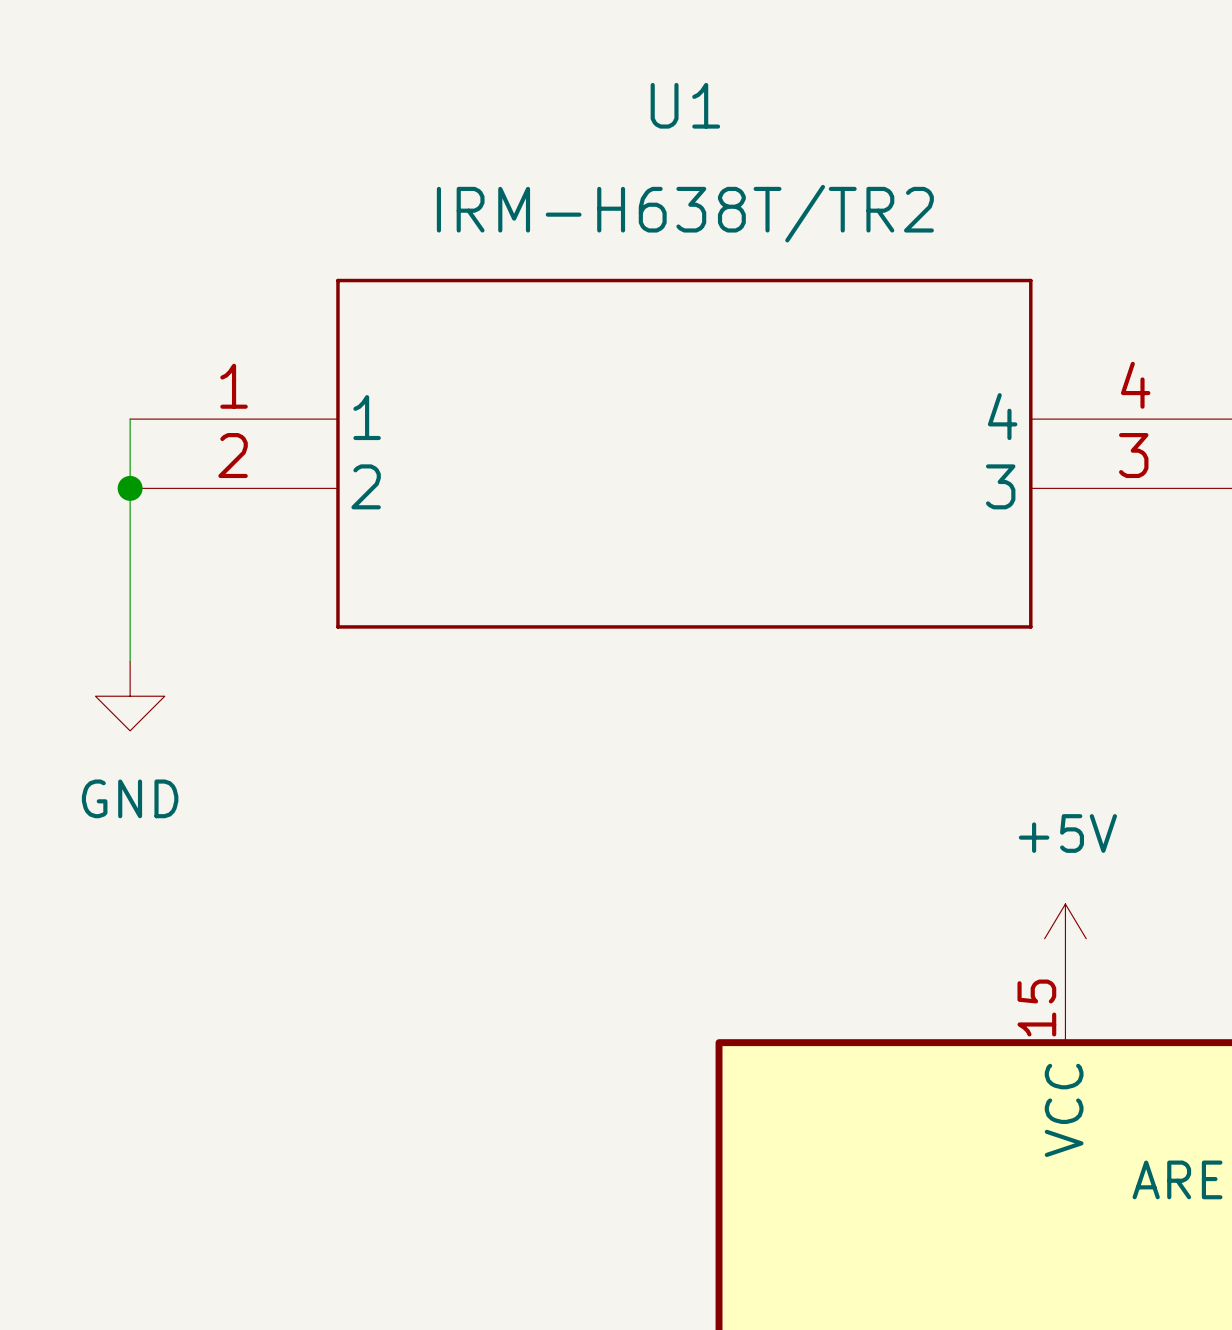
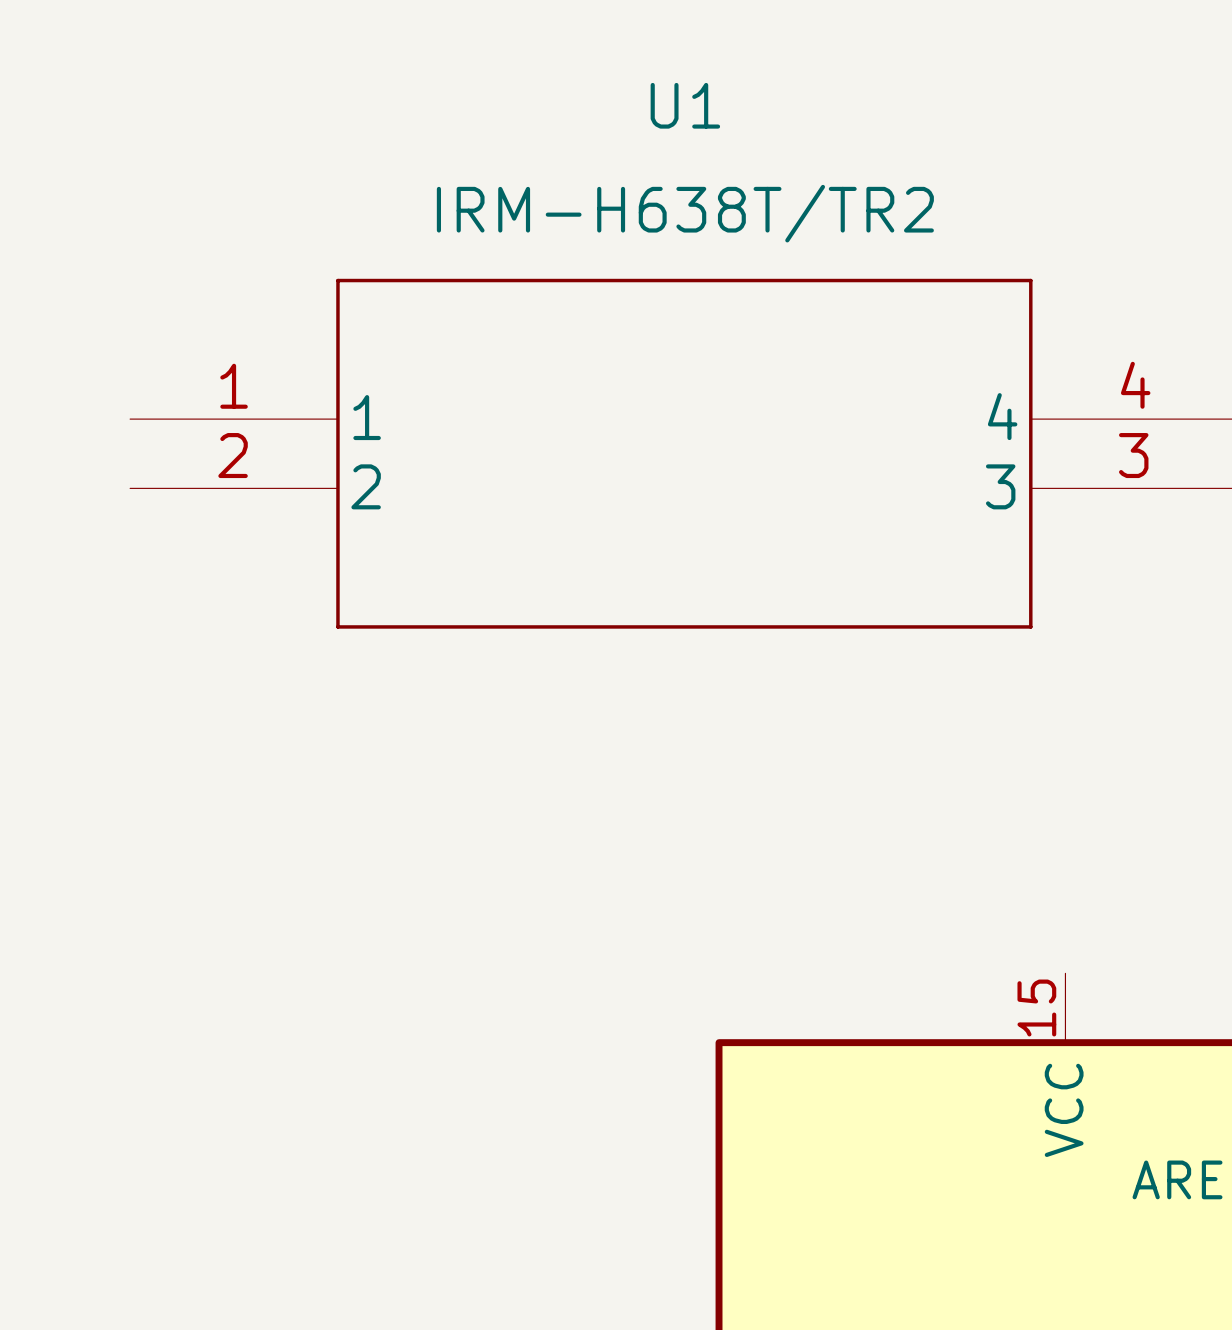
wire: (130, 419) (130, 661) -> none
junction: (130, 488) -> none
power symbol: GND (130, 696) -> none
power symbol: +5V (1065, 938) -> none

